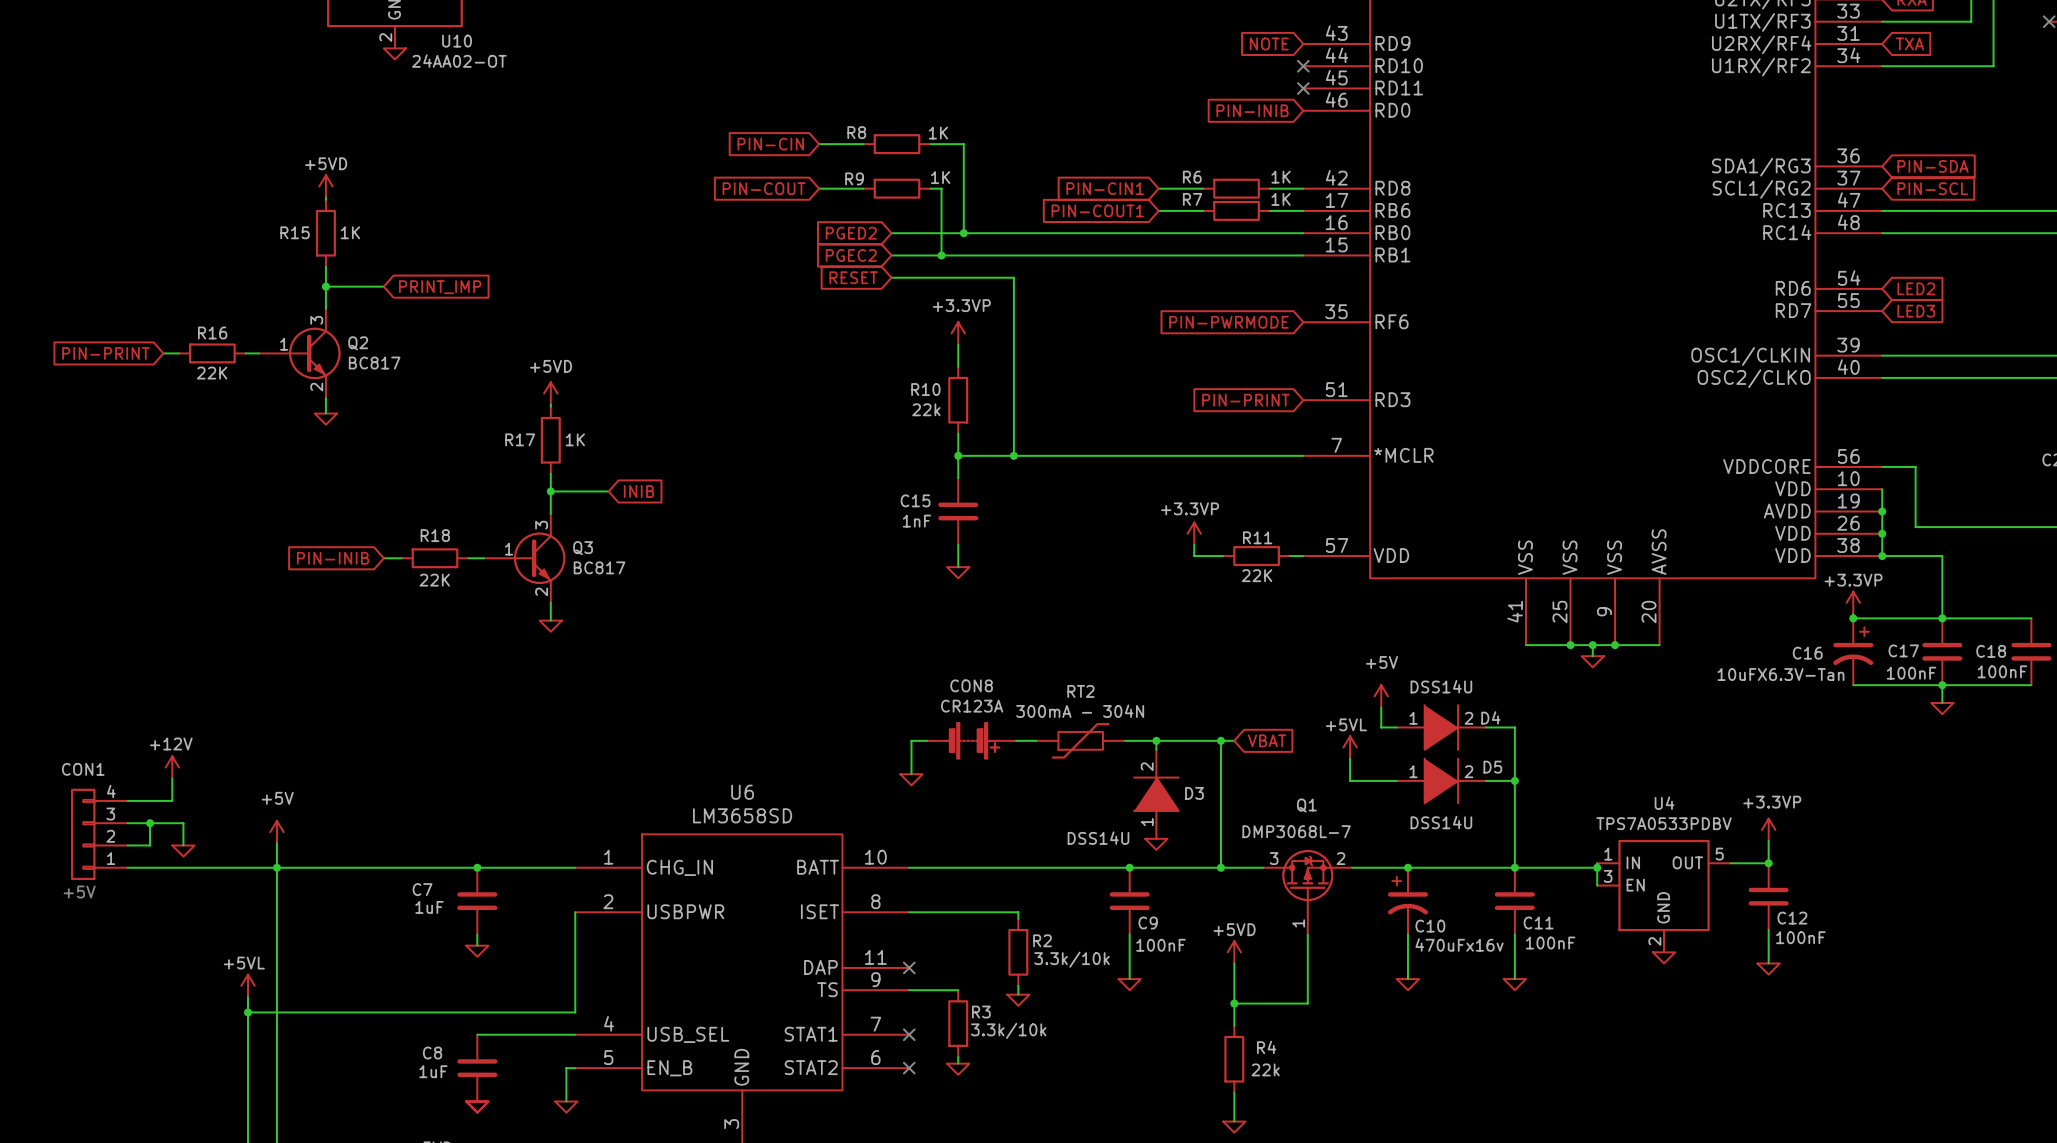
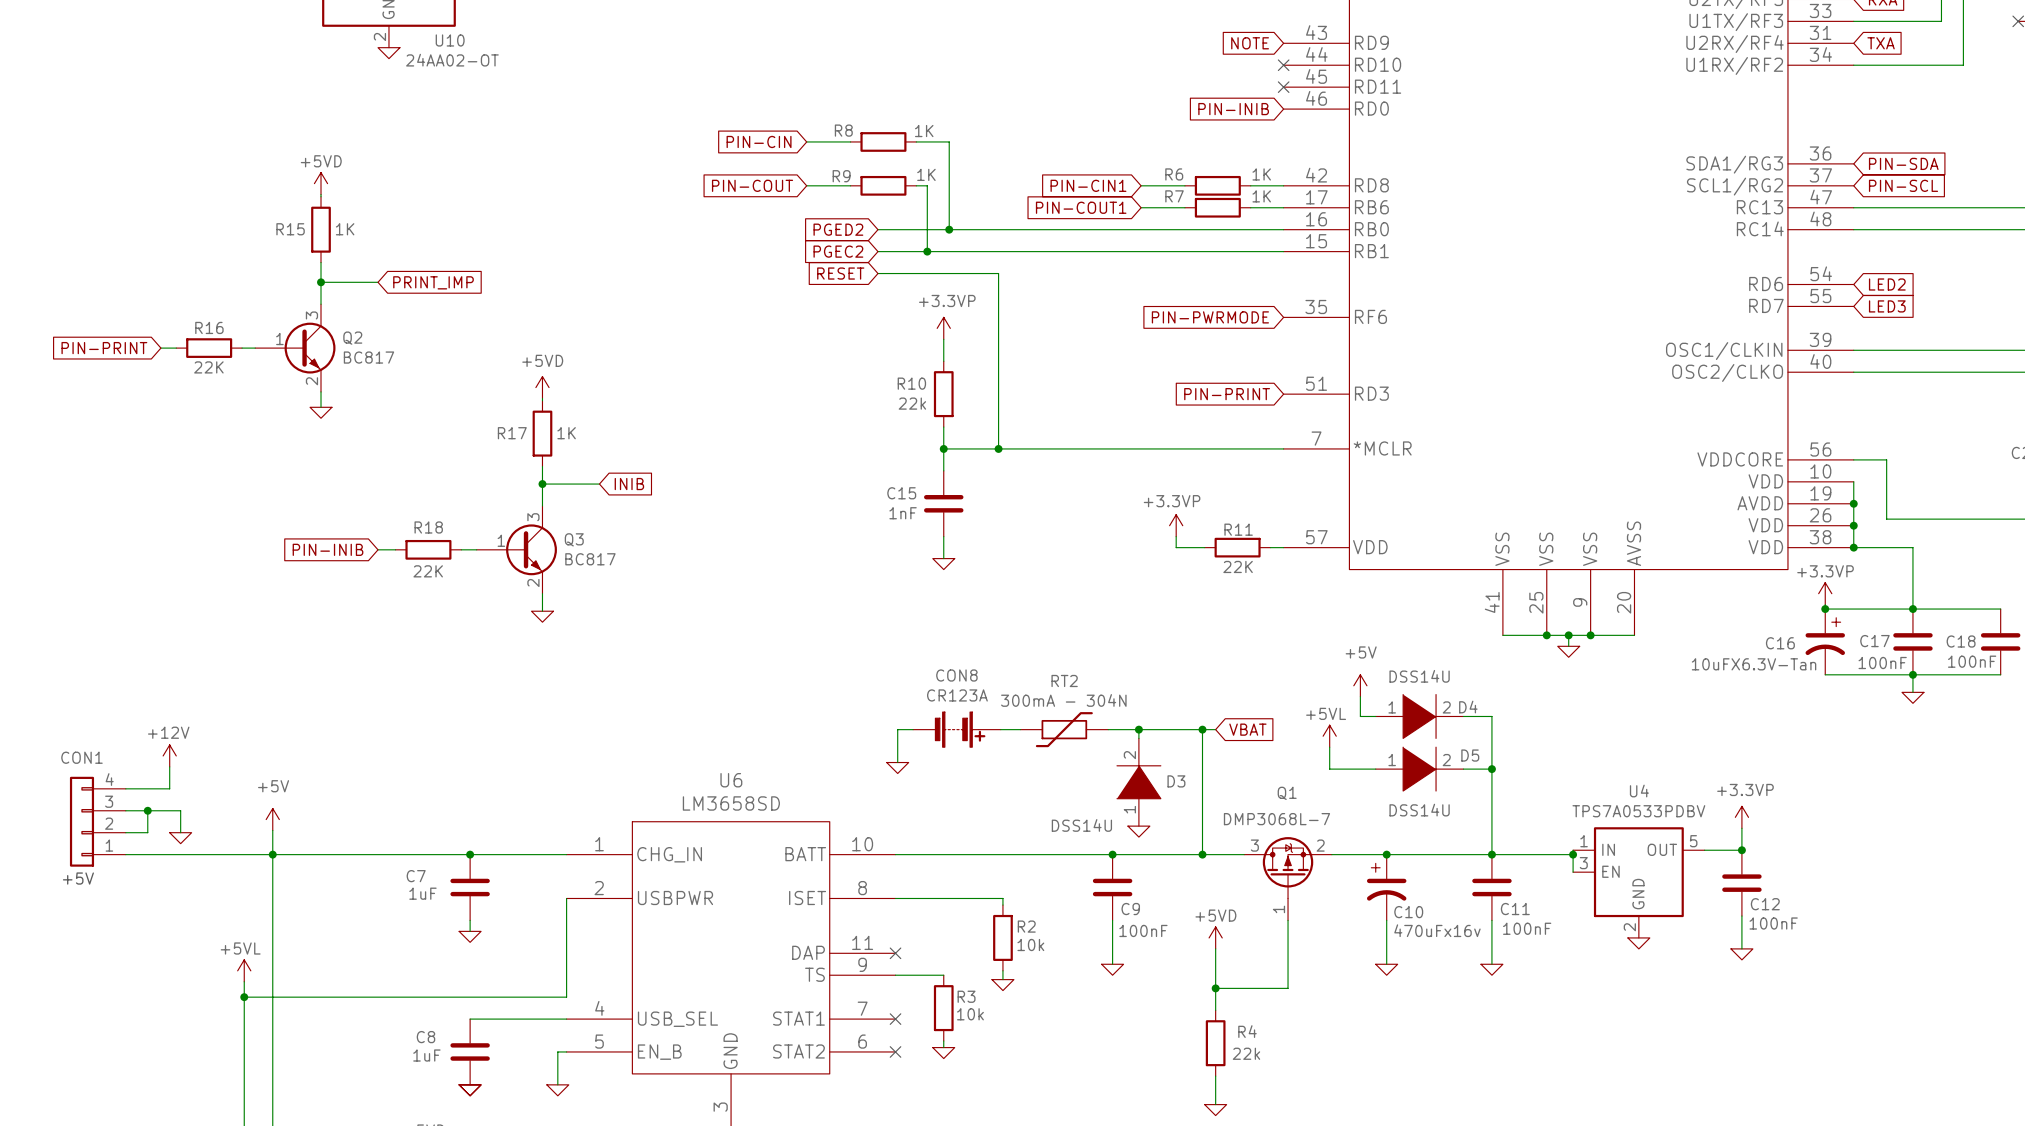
R2 value: 3.3k/10k (1072, 959) -> 10k (1030, 944)
R3 value: 3.3k/10k (1008, 1030) -> 10k (970, 1014)

